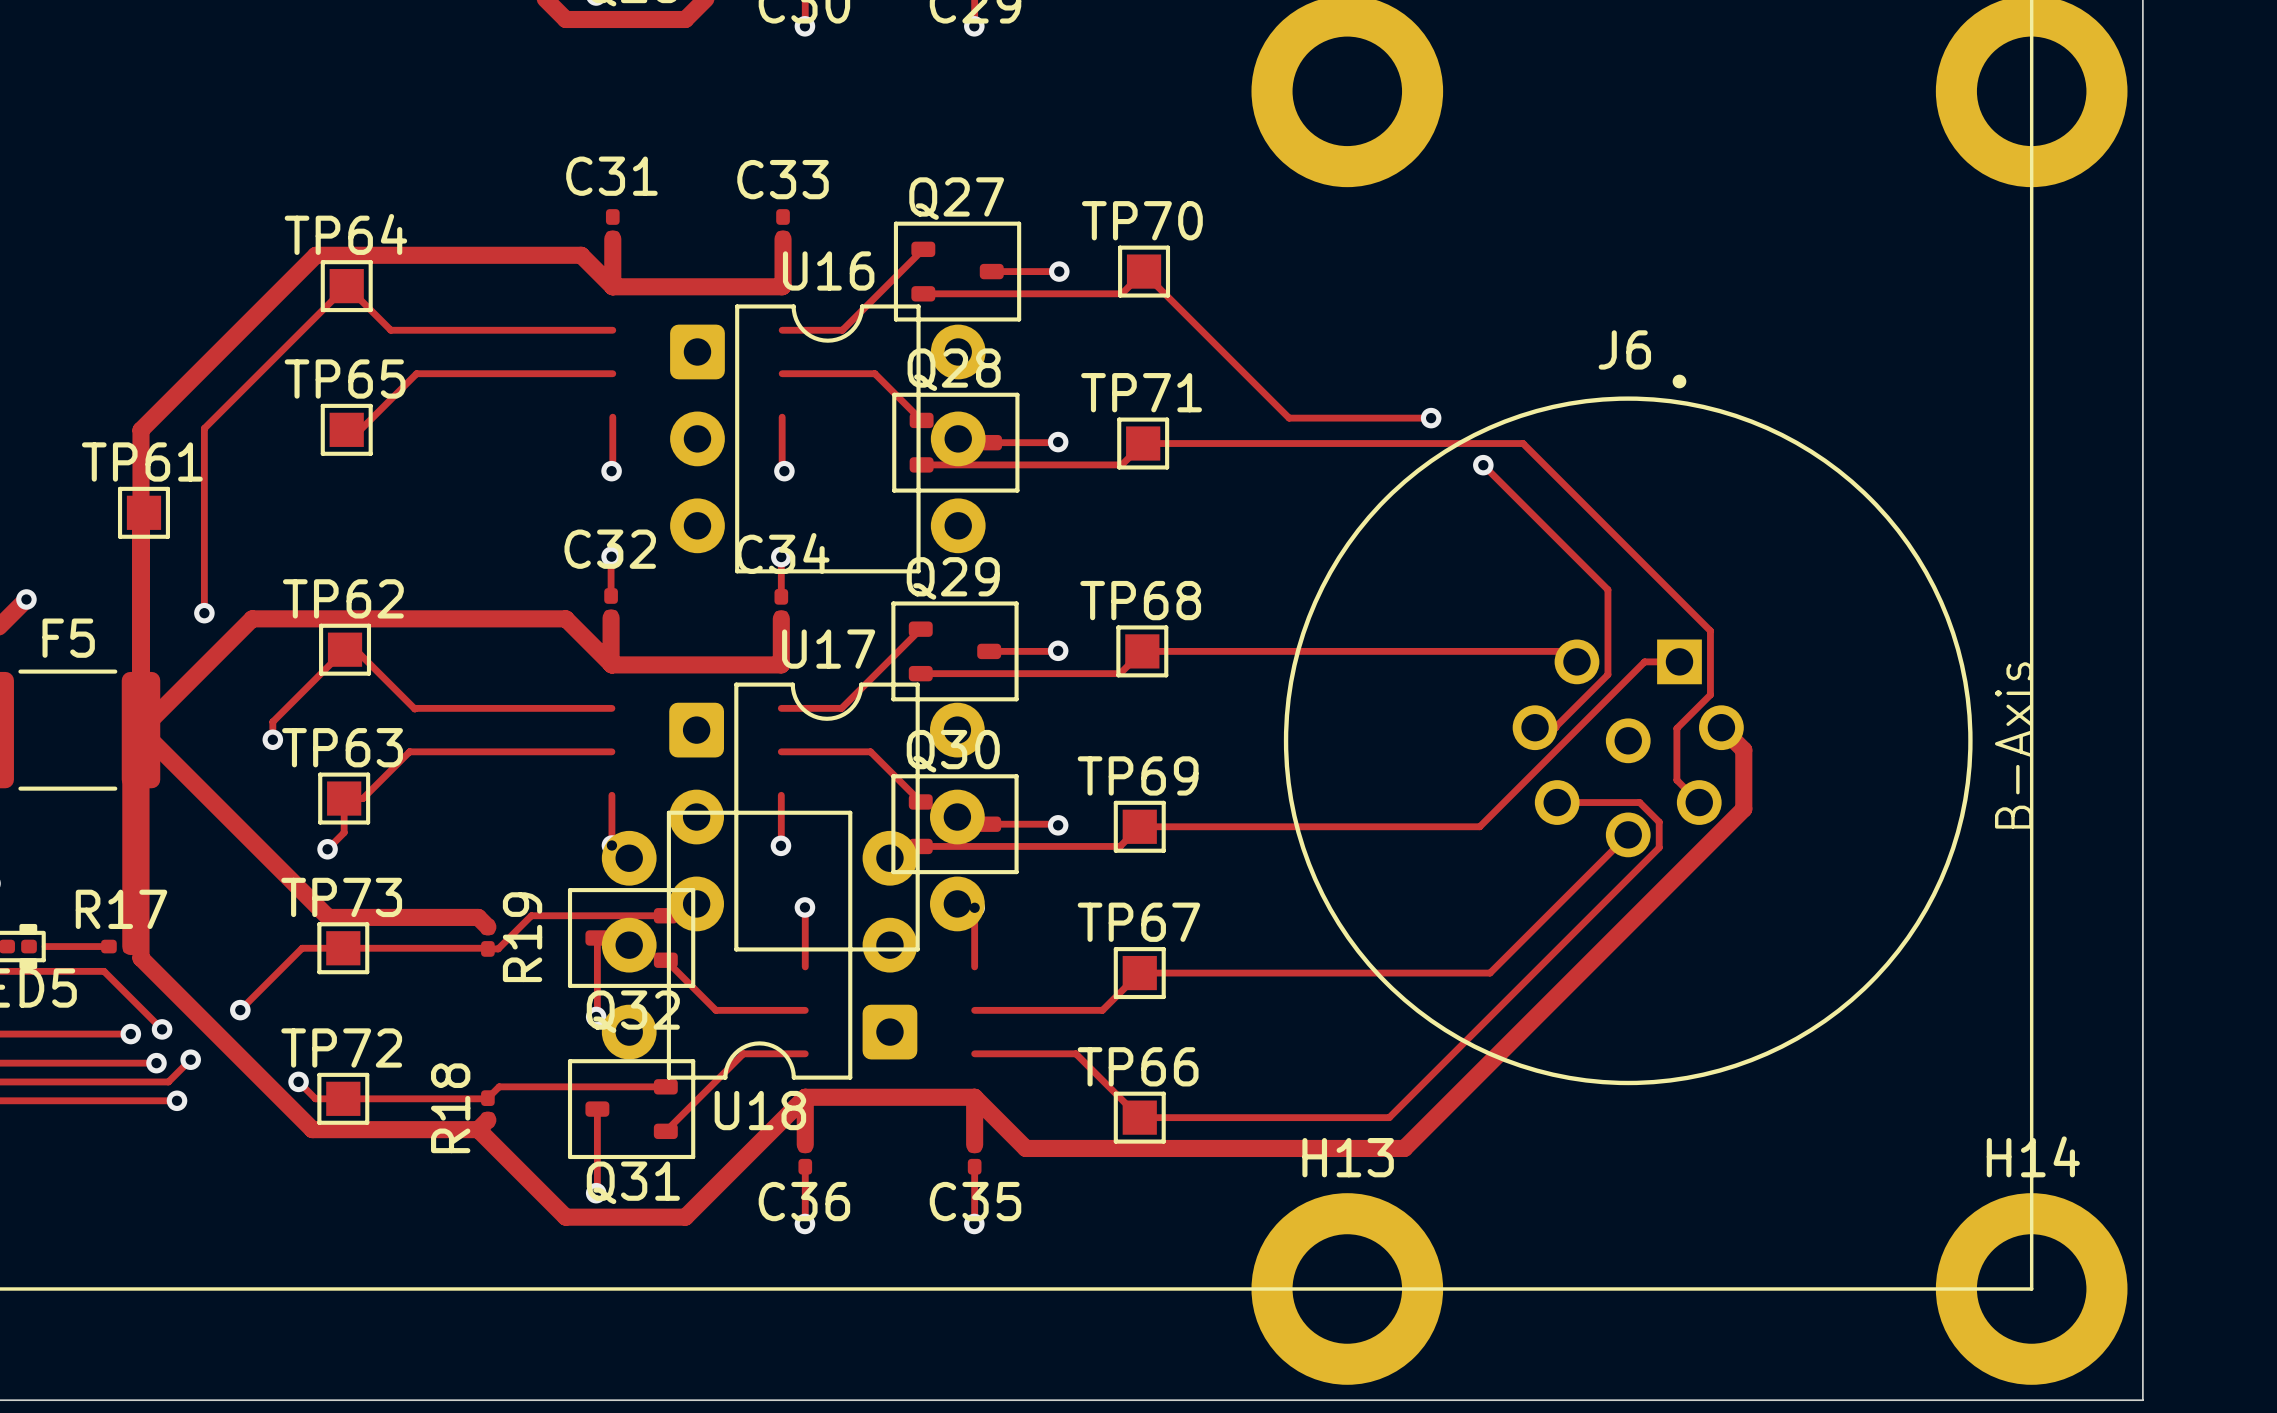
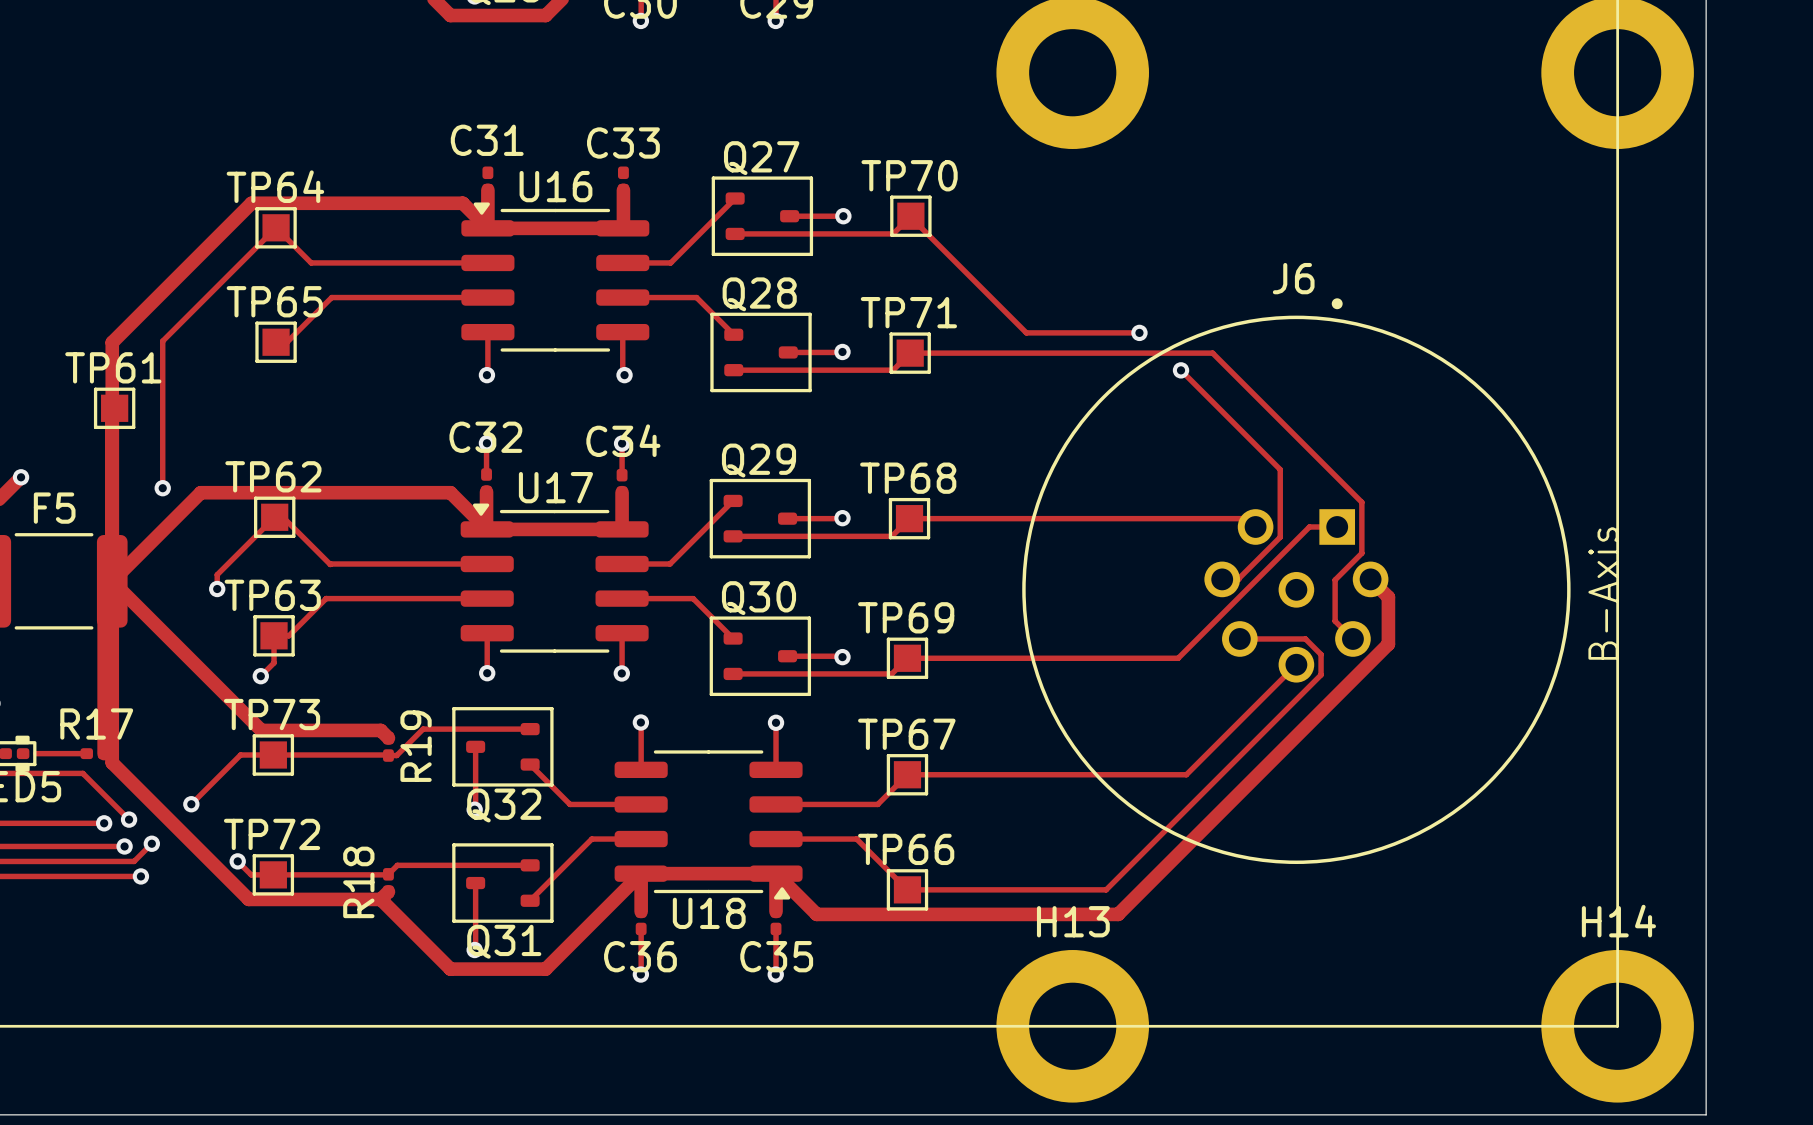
U16 footprint: [670, 304, 986, 574] -> [461, 202, 650, 352]
U17 footprint: [669, 682, 985, 952] -> [460, 503, 649, 653]
U18 footprint: [601, 810, 918, 1080] -> [614, 750, 803, 900]

